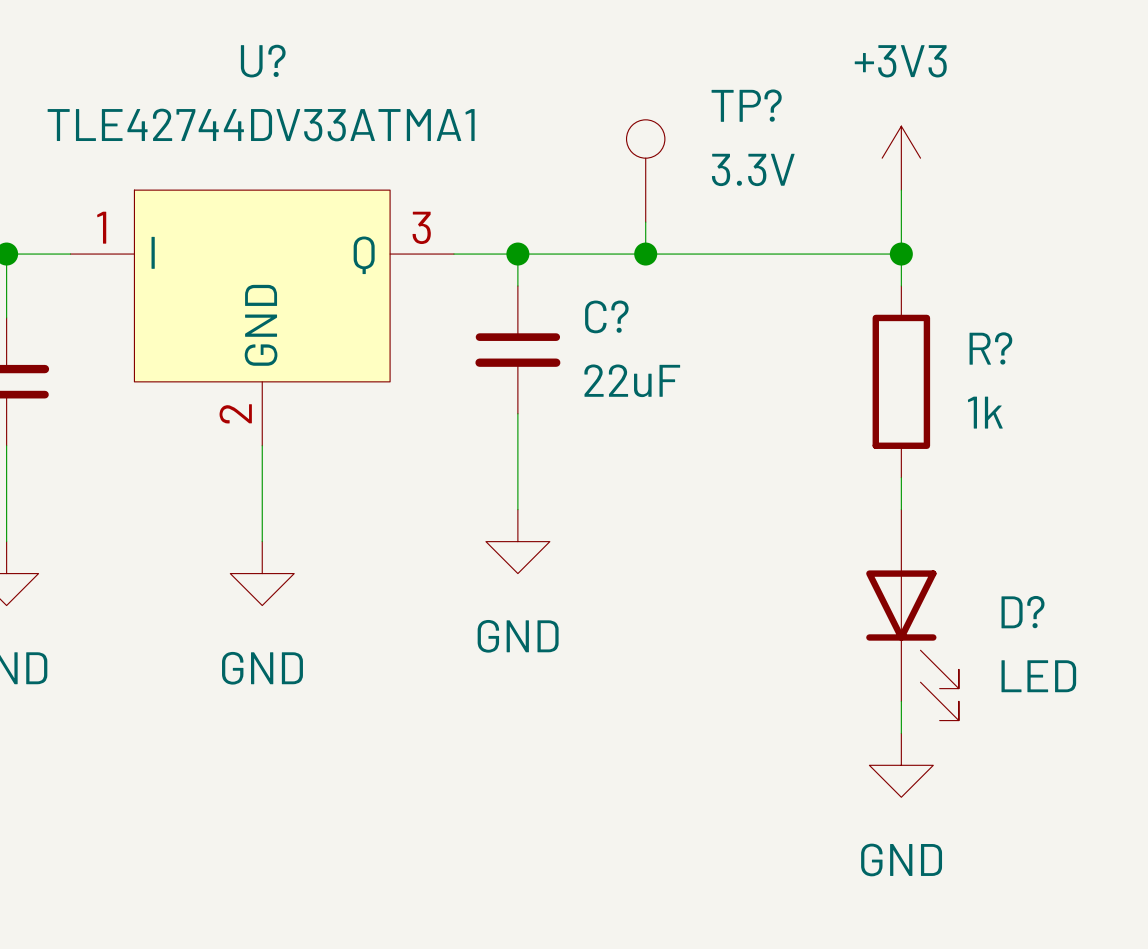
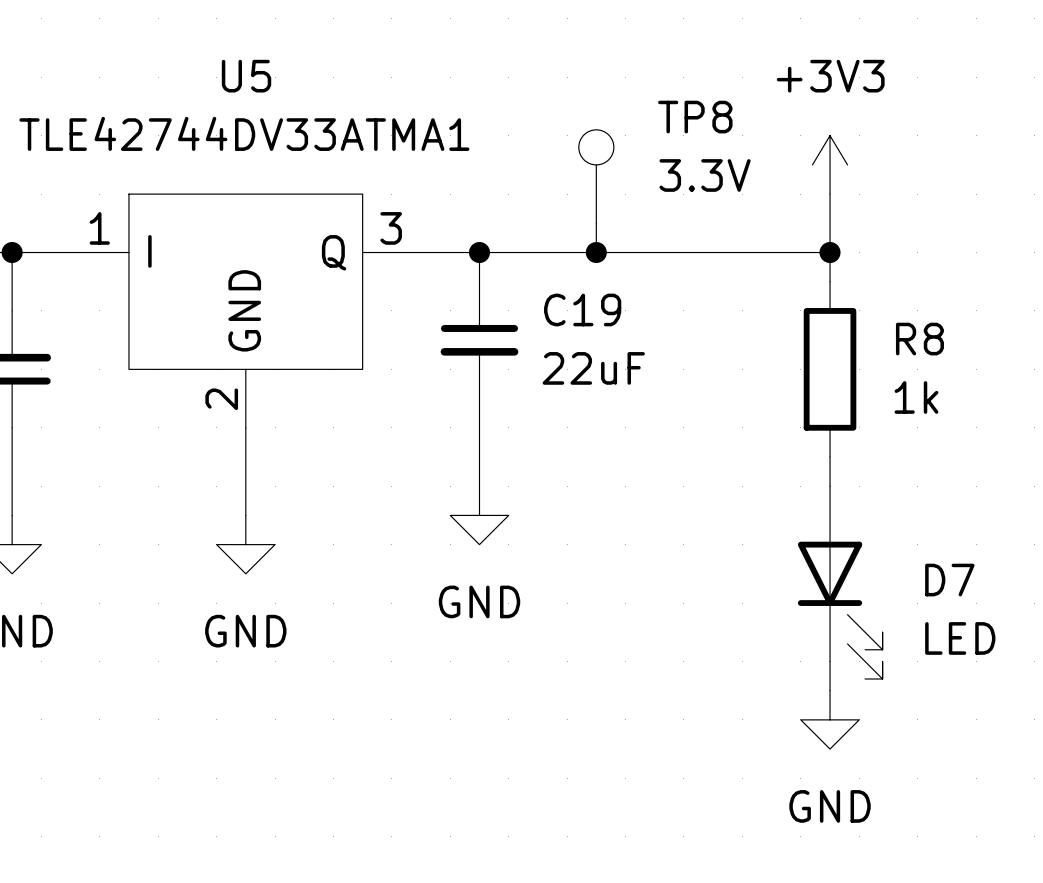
U? name: U? (263, 61) -> U5 (246, 76)
TP? name: TP? (746, 105) -> TP8 (695, 117)
C? name: C? (606, 316) -> C19 (582, 309)
R? name: R? (990, 348) -> R8 (919, 339)
D? name: D? (1023, 612) -> D7 (949, 580)

